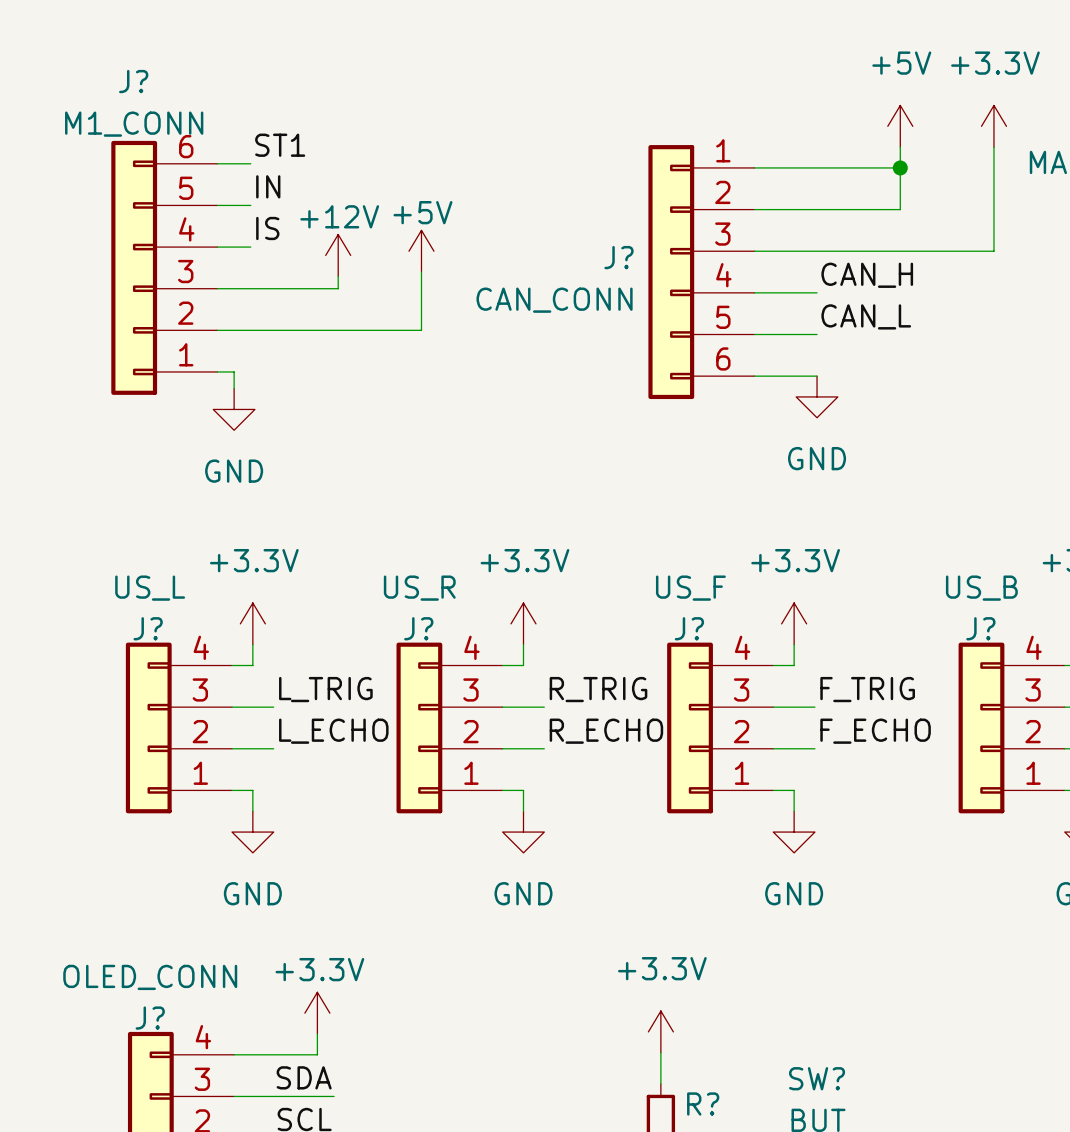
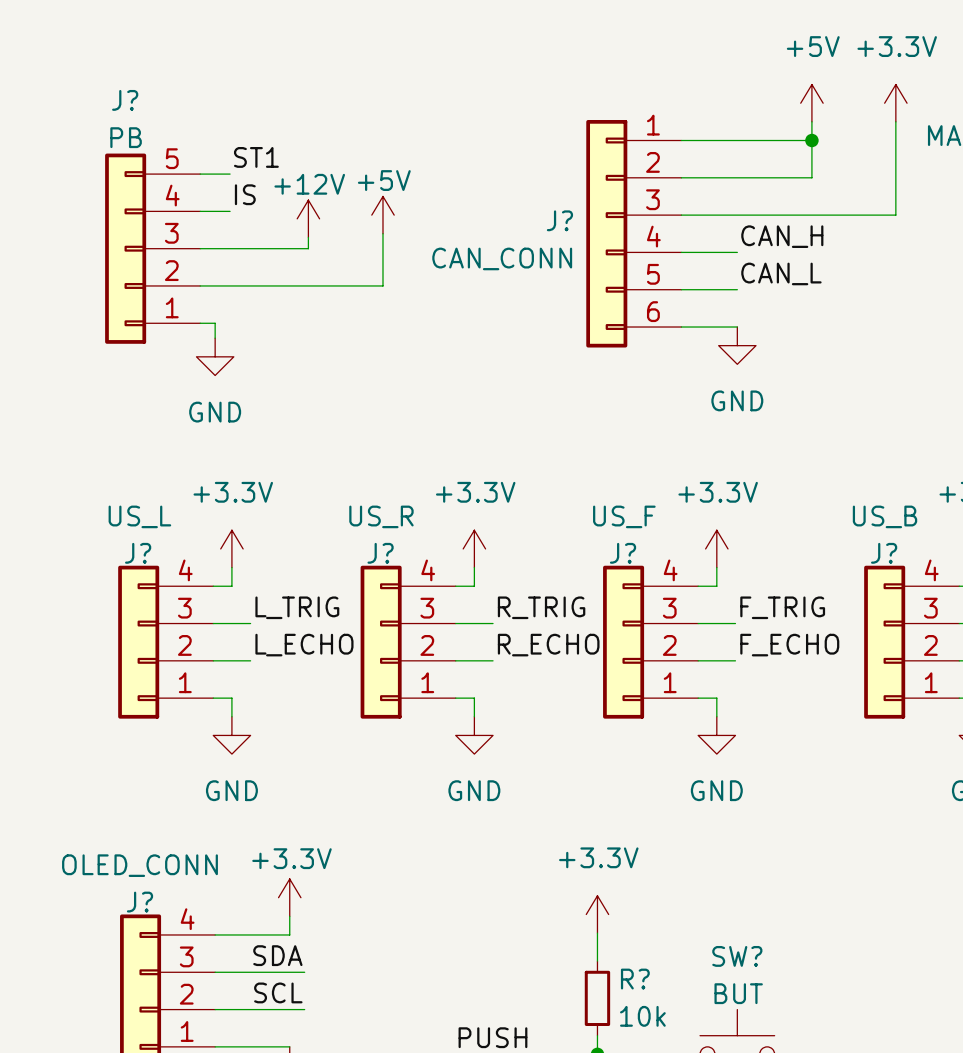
label: ST1 (280, 145) -> none
wire: (217, 163) (250, 163) -> none
label: IN (268, 186) -> ST1 (256, 157)
J?: M1_CONN (164, 267) -> none
J?: none -> PB (152, 248)

